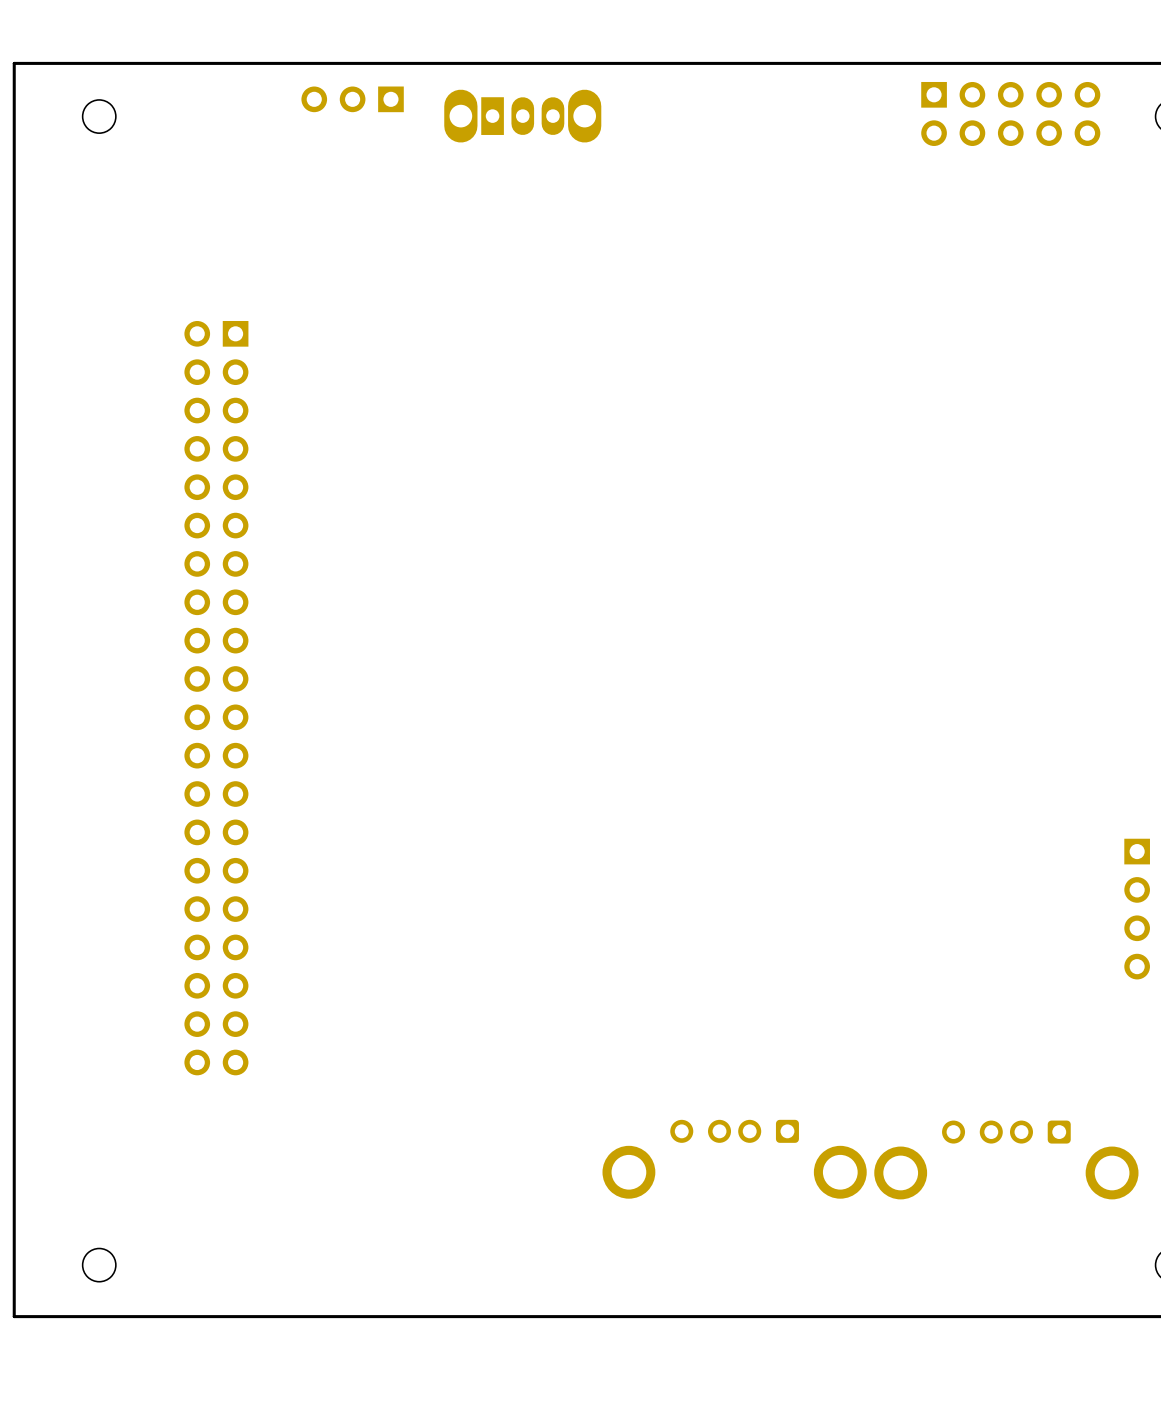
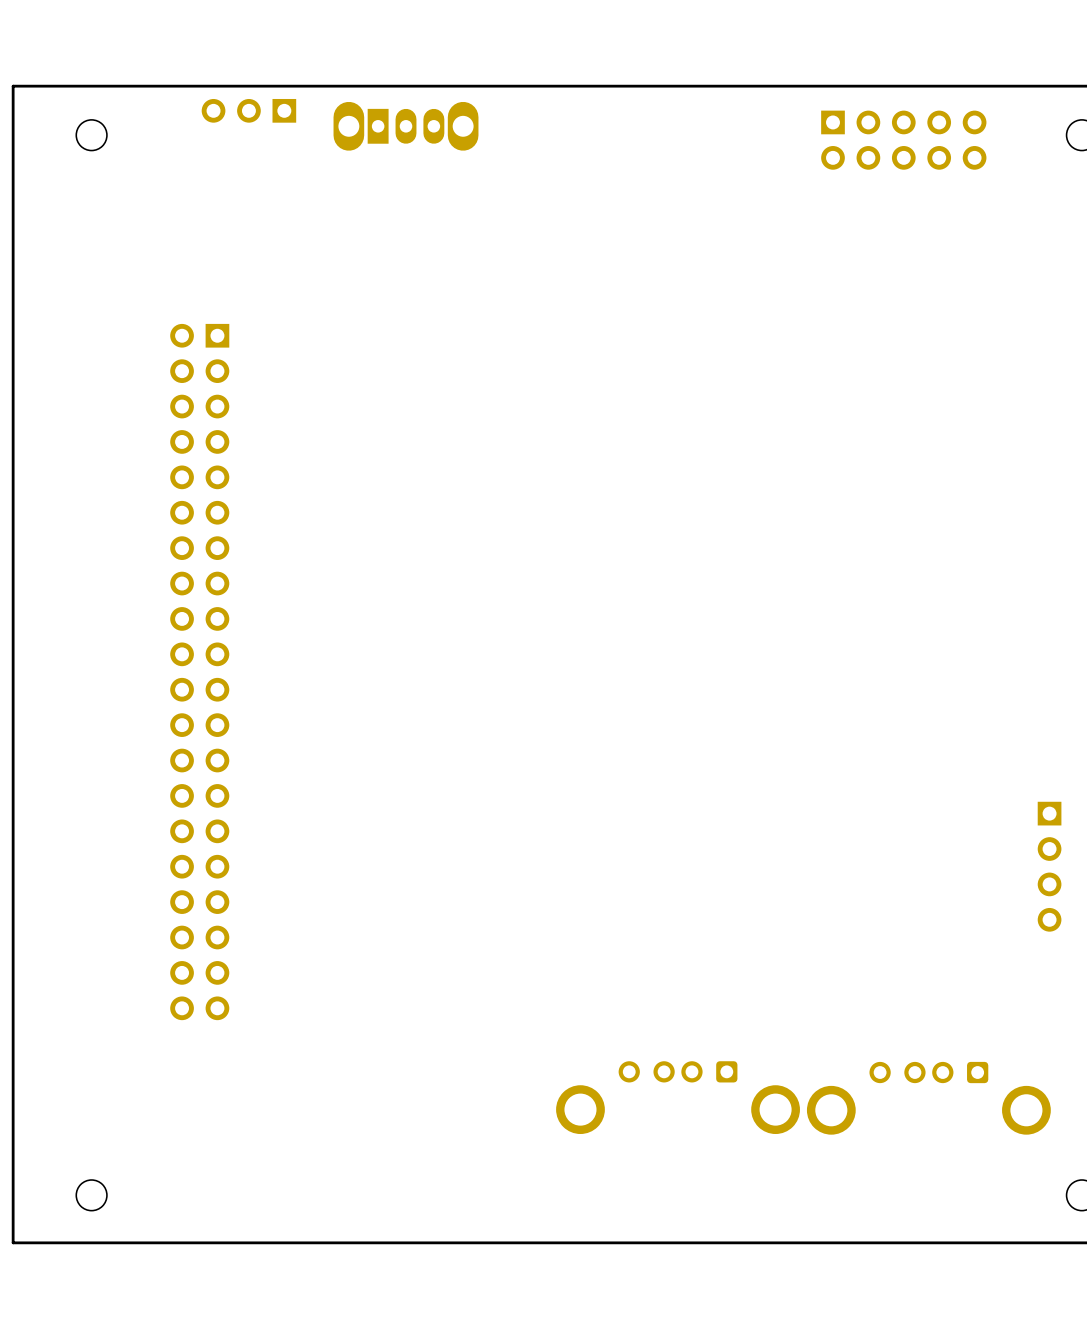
part position: (352, 99) -> (248, 110)
part position: (1010, 113) -> (903, 140)
part position: (522, 116) -> (406, 126)

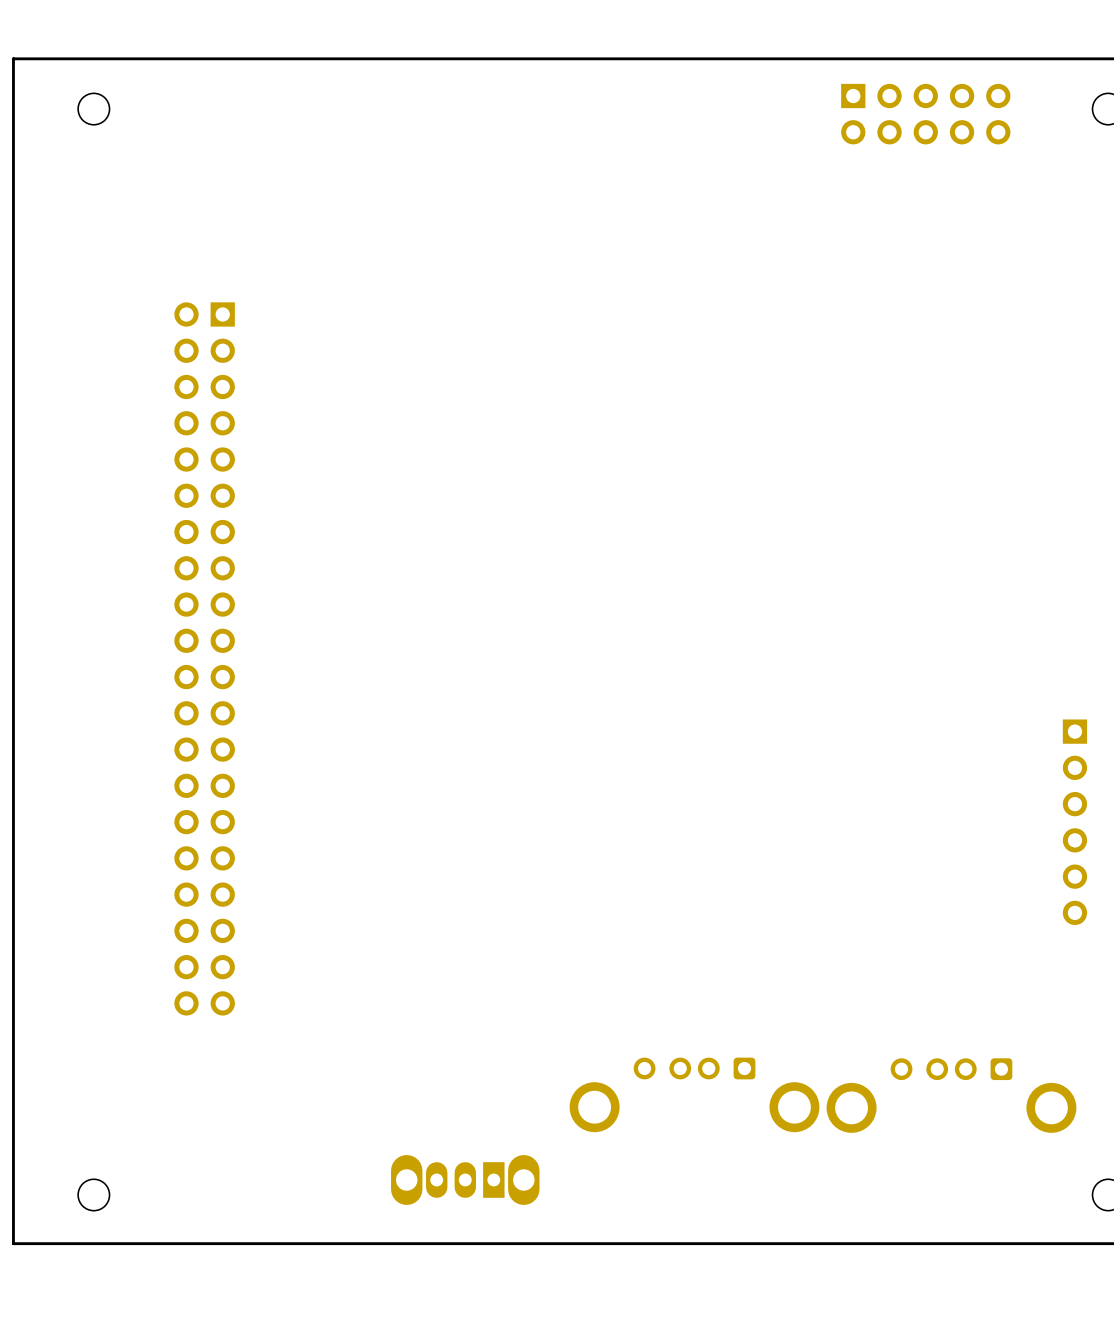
part: (248, 110) -> none
part: (406, 126) -> none
part: none -> (1074, 822)
part: (1049, 866) -> none
part: none -> (465, 1179)

